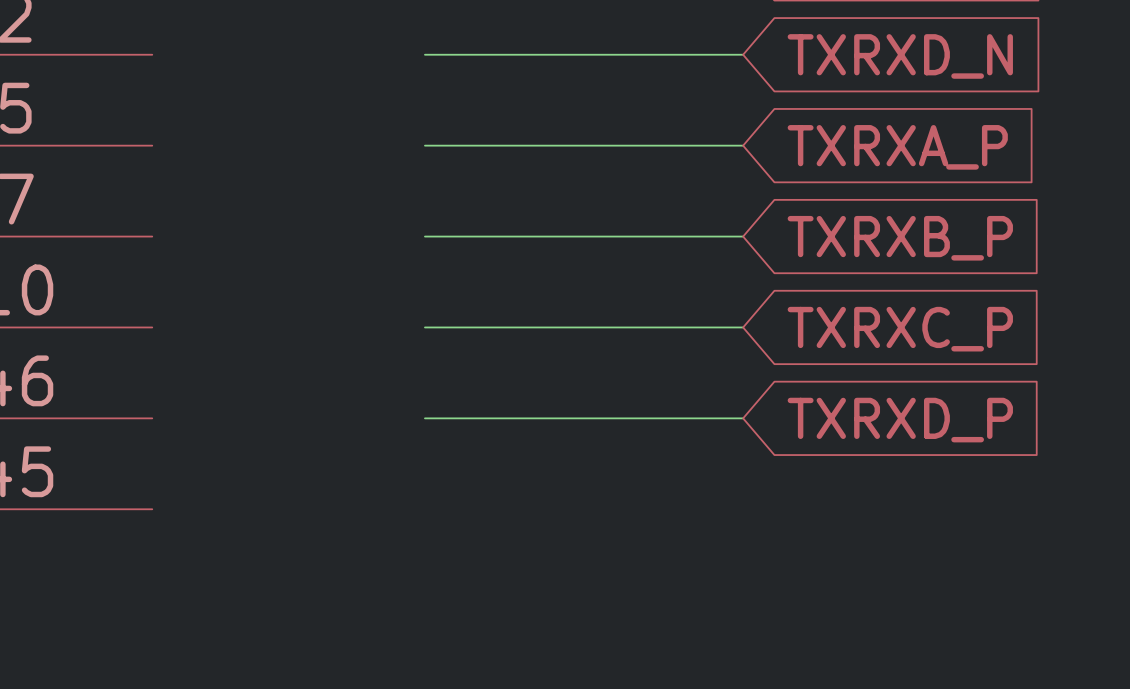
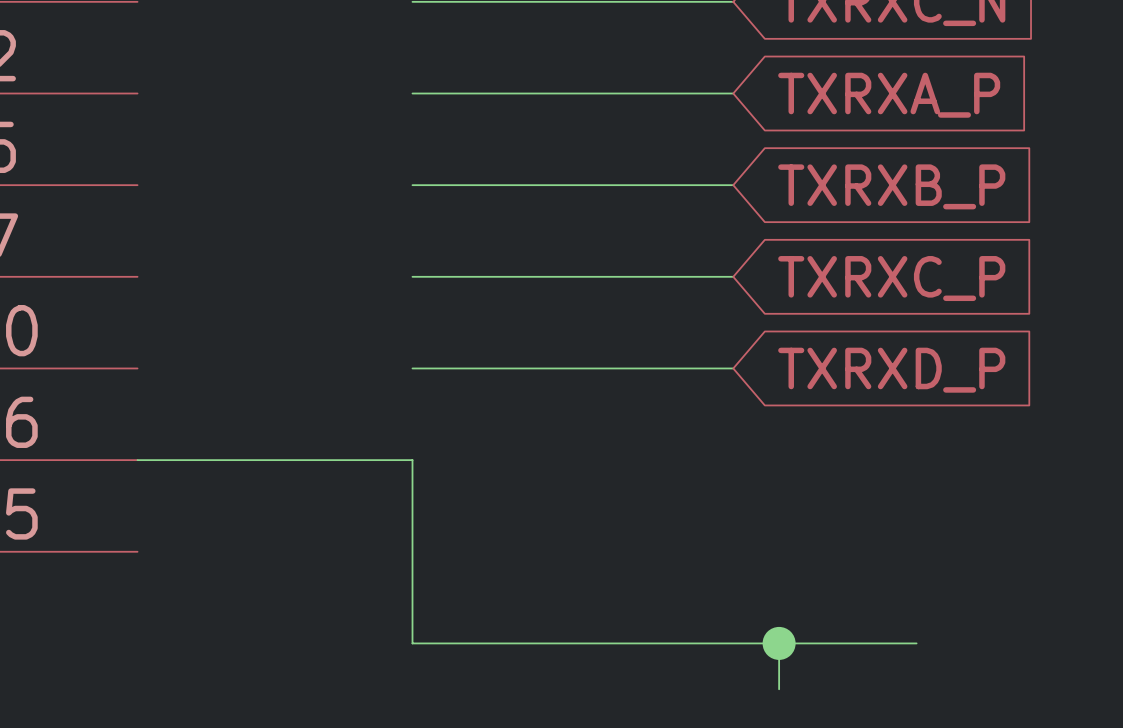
global label: TXRXD_N (900, 56) -> TXRXA_P (889, 95)
global label: TXRXA_P (897, 147) -> TXRXB_P (891, 186)
global label: TXRXB_P (900, 238) -> TXRXC_P (891, 278)
global label: TXRXC_P (900, 329) -> TXRXD_P (891, 370)
wire: none -> (137, 460) (412, 460) (412, 643) (916, 643)
wire: (424, 418) (743, 418) -> none
global label: TXRXD_P (900, 420) -> none
wire: none -> (779, 643) (779, 689)
junction: none -> (779, 643)

